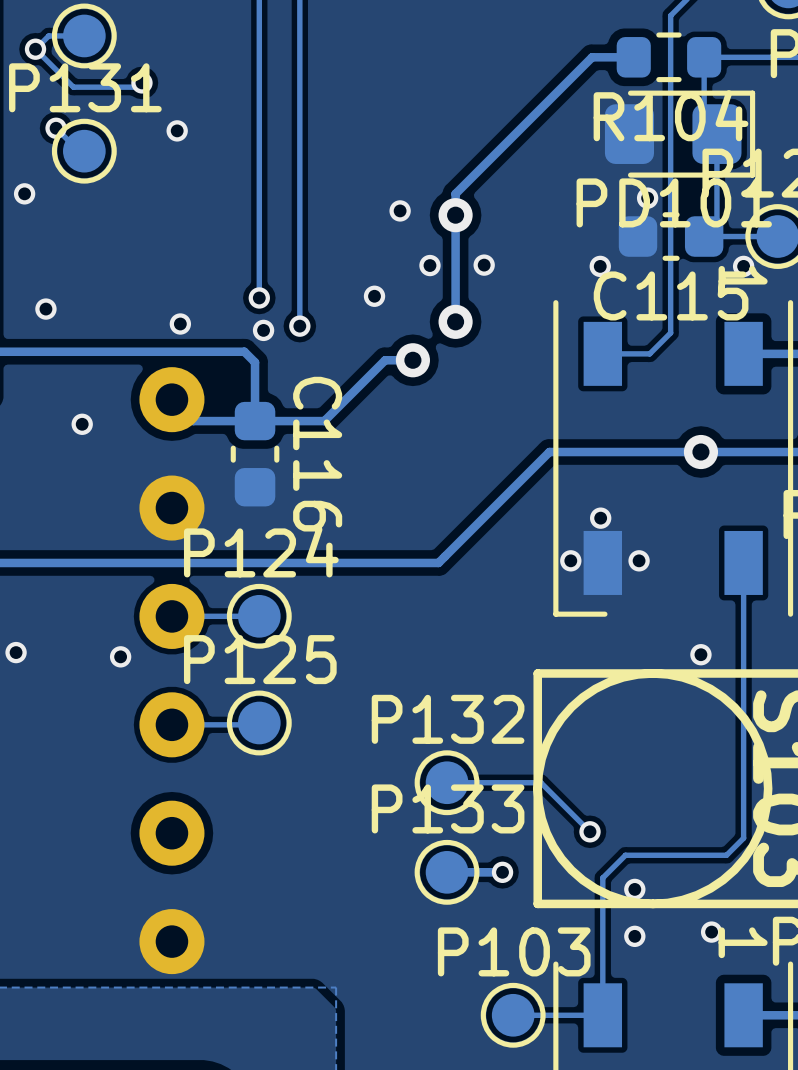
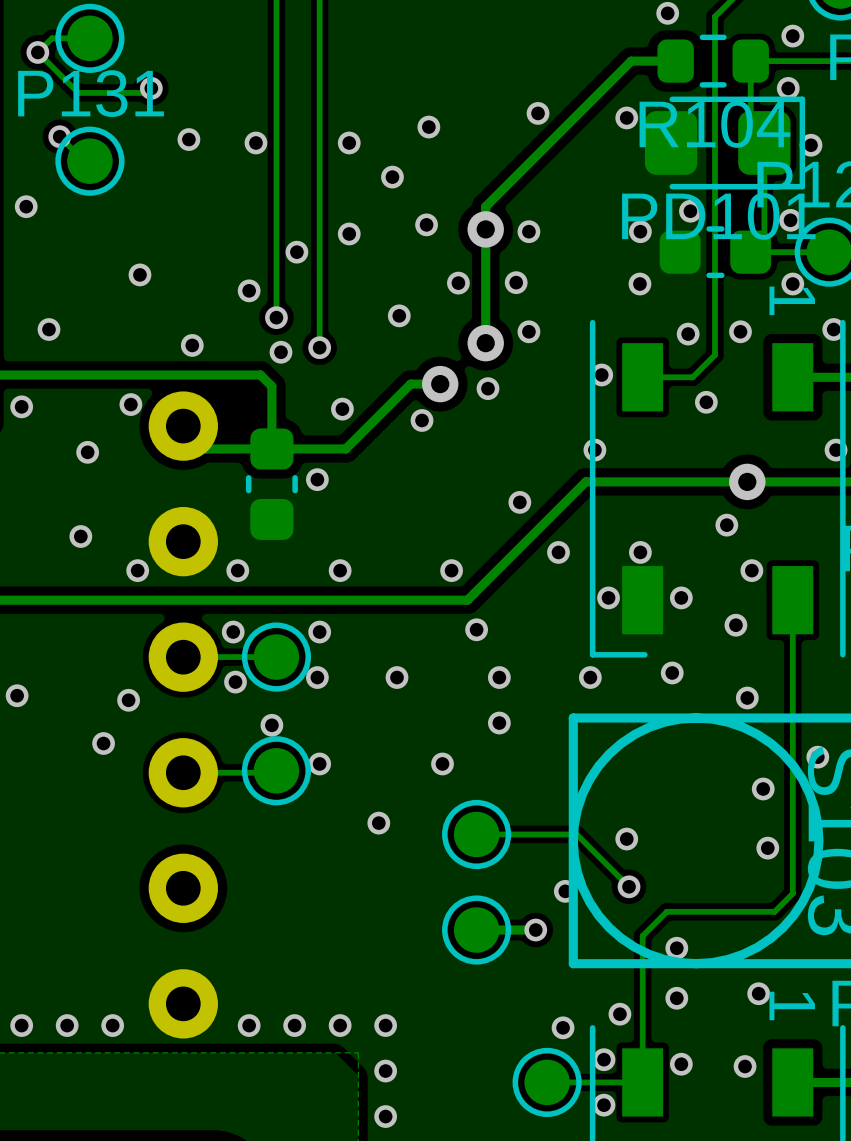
via: none -> (667, 13)
via: none -> (792, 36)
via: none -> (788, 88)
via: none -> (538, 113)
via: none -> (626, 117)
via: none -> (428, 127)
via: none -> (255, 142)
via: none -> (349, 142)
via: none -> (811, 145)
via: none -> (392, 177)
via: none -> (790, 220)
via: none -> (528, 231)
via: none -> (640, 231)
via: none -> (349, 233)
via: none -> (296, 252)
via: none -> (139, 274)
via: none -> (249, 290)
C115 name: C115 (671, 295) -> none
via: none -> (833, 329)
via: none -> (528, 331)
via: none -> (740, 331)
via: none -> (688, 334)
via: none -> (601, 375)
via: none -> (487, 388)
via: none -> (706, 402)
via: none -> (130, 404)
via: none -> (21, 406)
via: none -> (342, 409)
via: none -> (422, 420)
via: none -> (594, 450)
via: none -> (836, 450)
via: none -> (317, 479)
C116 name: C116 (317, 454) -> none
via: none -> (519, 502)
via: none -> (726, 525)
via: none -> (80, 536)
via: none -> (558, 552)
via: none -> (137, 570)
via: none -> (237, 570)
via: none -> (340, 570)
via: none -> (451, 570)
via: none -> (751, 570)
P124 name: P124 (261, 551) -> none
via: none -> (735, 625)
via: none -> (476, 629)
via: none -> (233, 632)
via: none -> (319, 632)
via: none -> (672, 672)
via: none -> (317, 677)
via: none -> (397, 677)
via: none -> (499, 677)
via: none -> (590, 677)
via: none -> (235, 682)
P125 name: P125 (260, 659) -> none
via: none -> (499, 723)
via: none -> (271, 725)
via: none -> (103, 743)
via: none -> (817, 757)
via: none -> (319, 763)
via: none -> (442, 763)
P132 name: P132 (448, 719) -> none
via: none -> (763, 788)
via: none -> (378, 823)
via: none -> (626, 839)
via: none -> (767, 848)
P133 name: P133 (448, 808) -> none
via: none -> (565, 891)
P103 name: P103 (514, 951) -> none
via: none -> (619, 1014)
via: none -> (21, 1025)
via: none -> (67, 1025)
via: none -> (112, 1025)
via: none -> (249, 1025)
via: none -> (294, 1025)
via: none -> (340, 1025)
via: none -> (385, 1025)
via: none -> (563, 1027)
via: none -> (604, 1059)
via: none -> (681, 1064)
via: none -> (745, 1066)
via: none -> (385, 1071)
via: none -> (604, 1105)
via: none -> (385, 1116)

